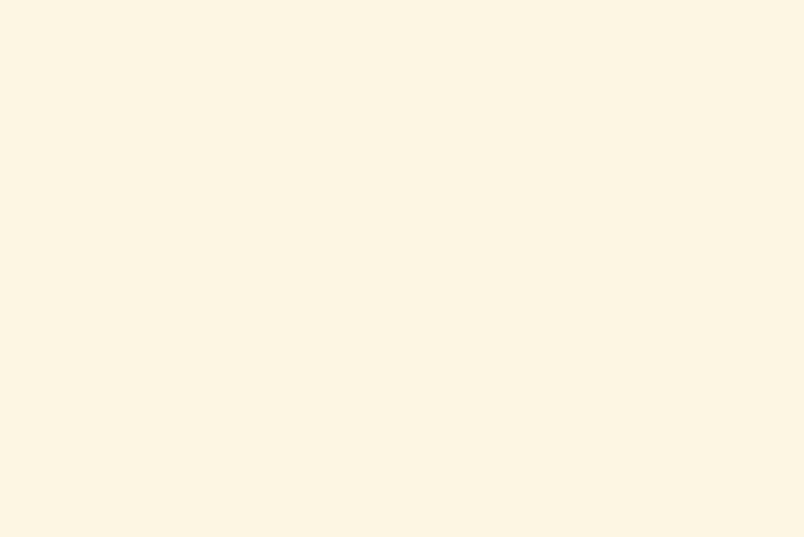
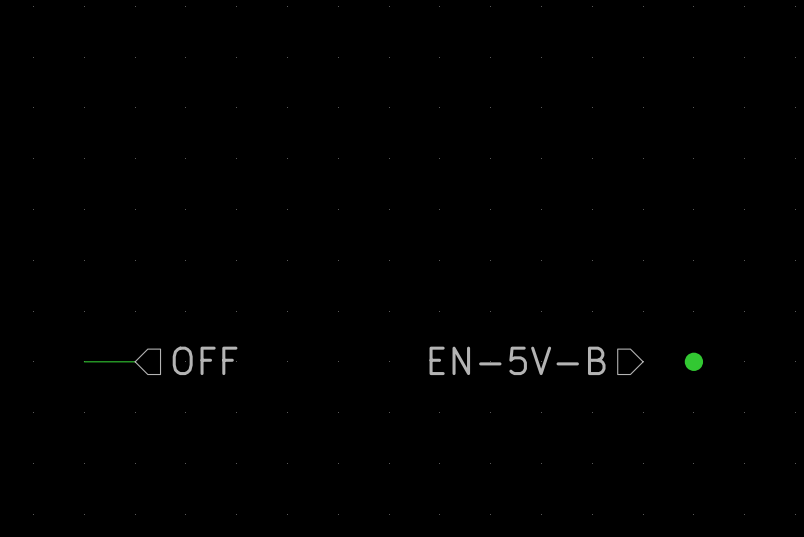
hierarchical label: none -> OFF (205, 360)
hierarchical label: none -> EN-5V-B (517, 360)
wire: none -> (84, 361) (135, 361)
junction: none -> (693, 361)

